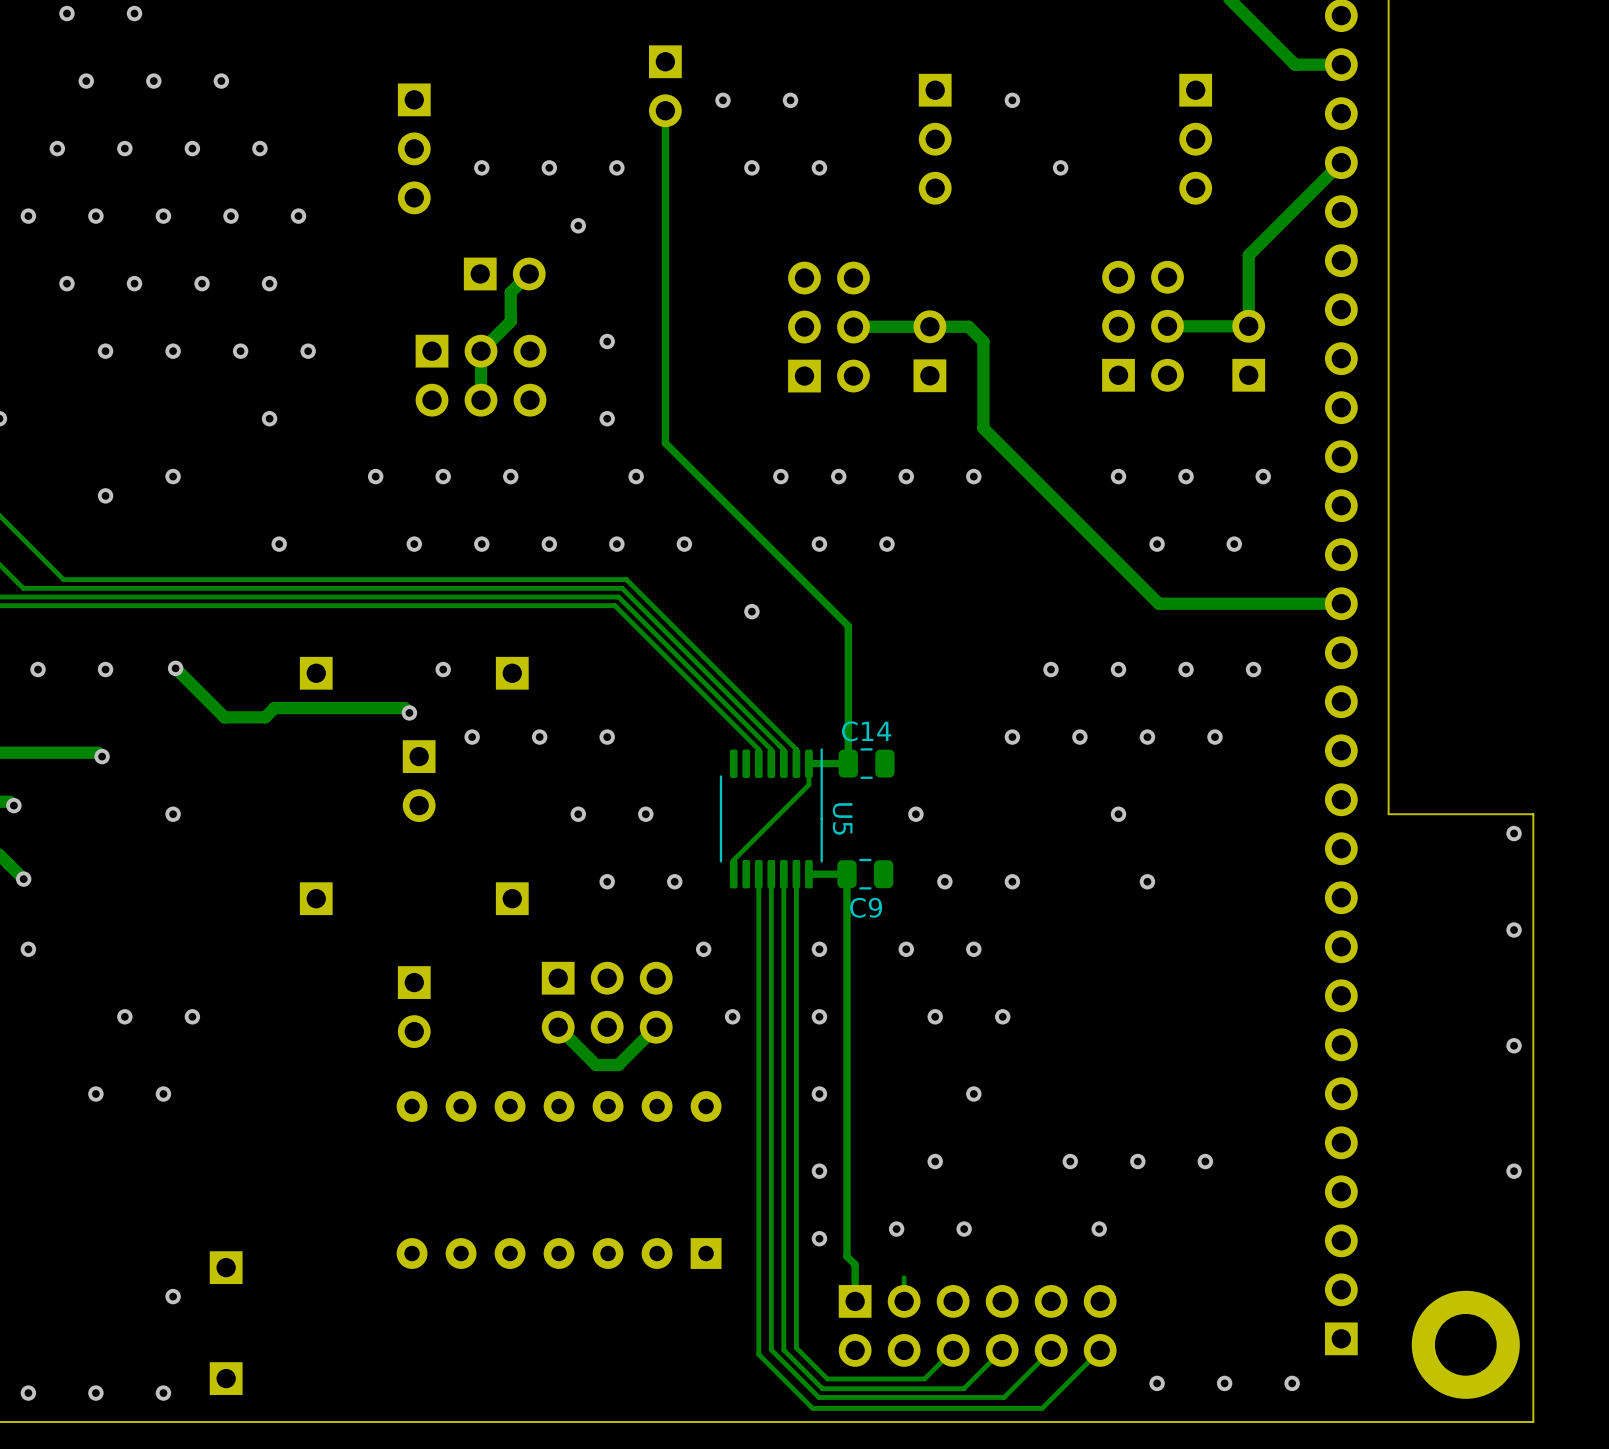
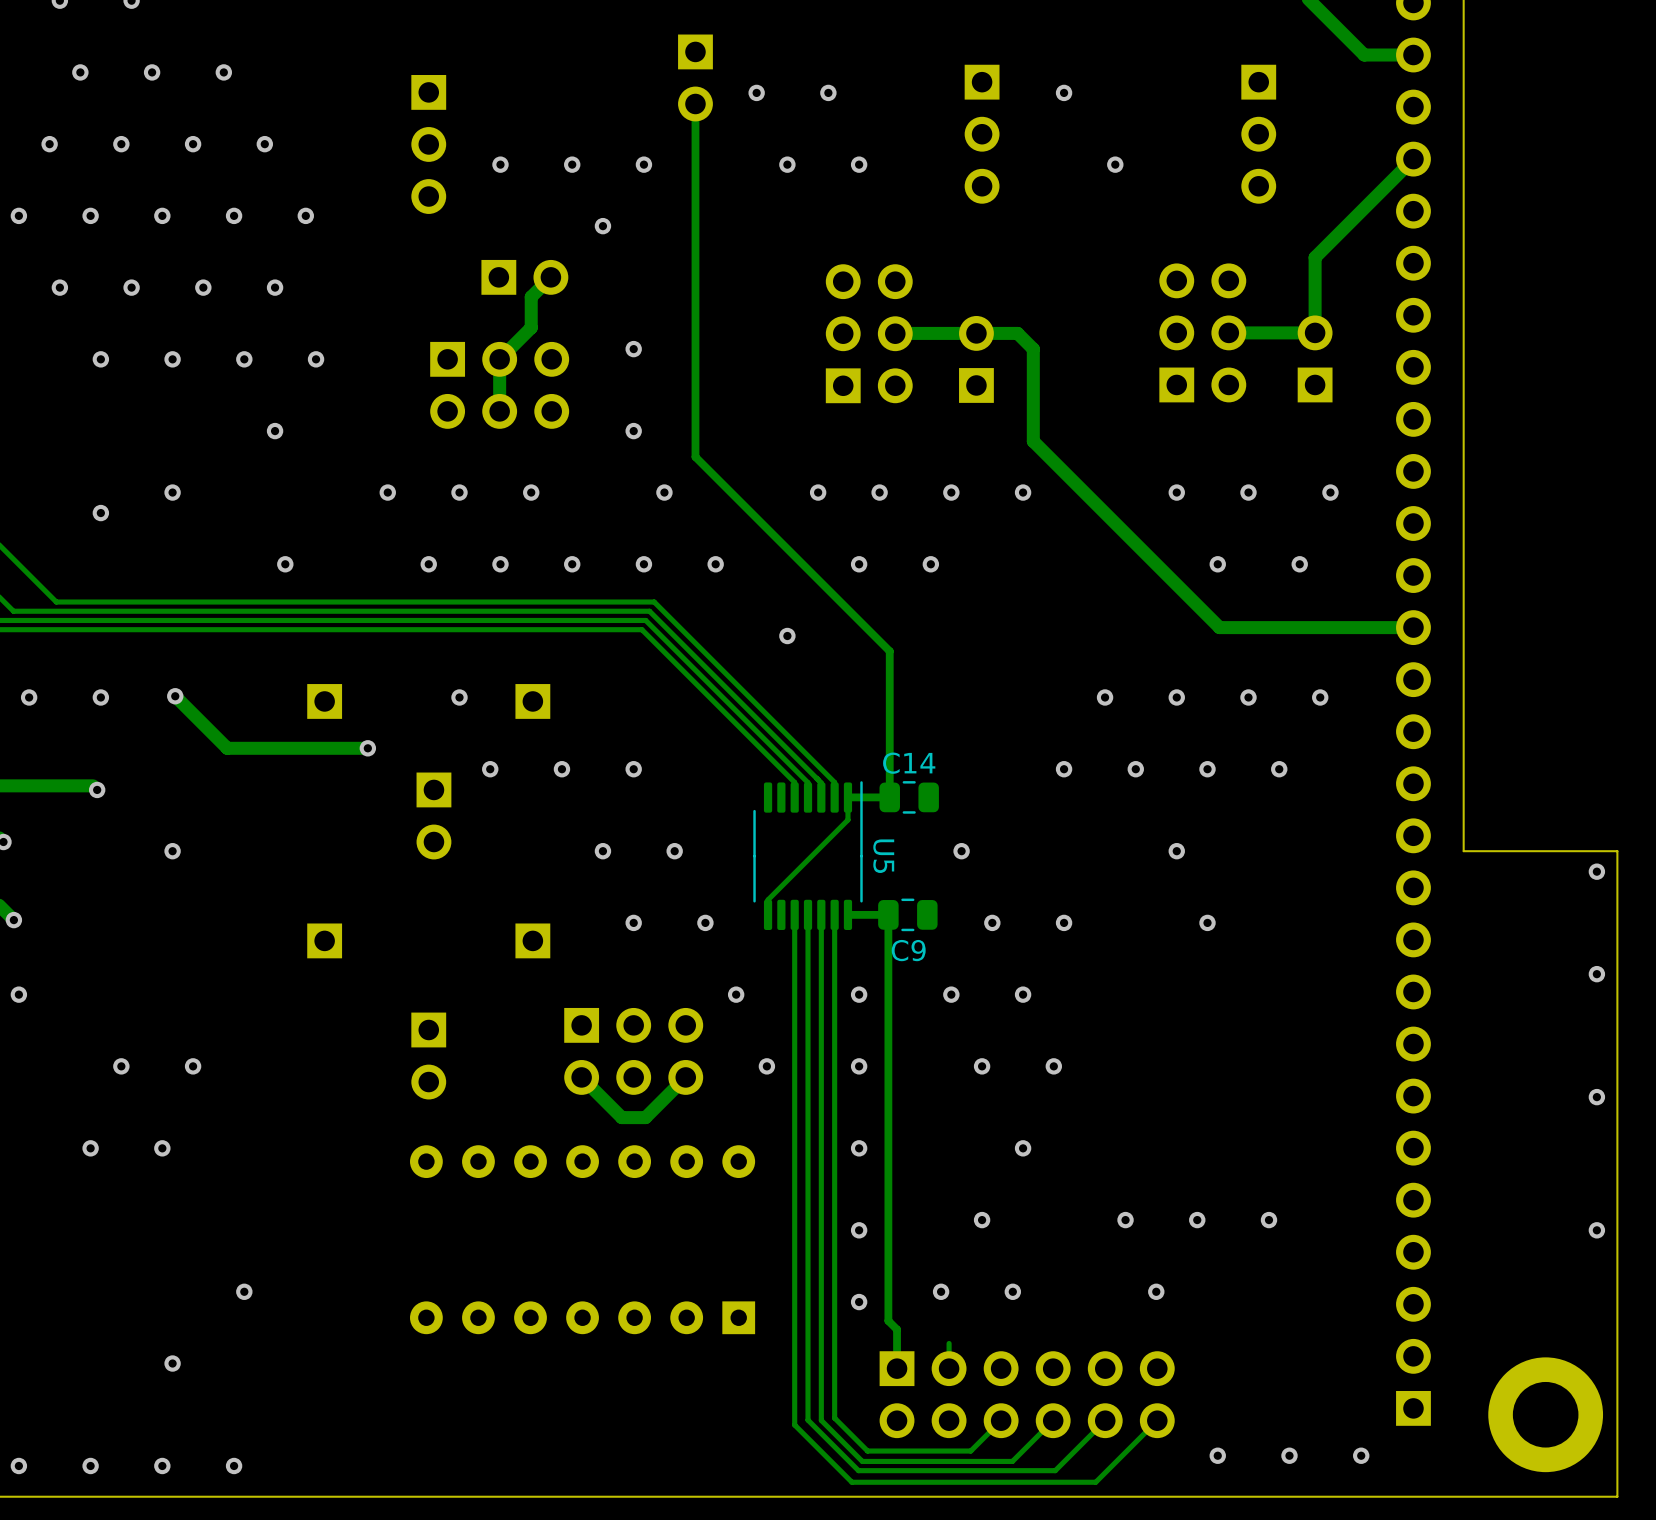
track: (409, 712) (404, 708) (274, 708) (265, 717) -> (367, 748) (270, 748)
via position: (409, 712) -> (367, 748)
via: none -> (244, 1291)
part: (226, 1267) -> none
part: (226, 1378) -> none
via: none -> (234, 1465)

